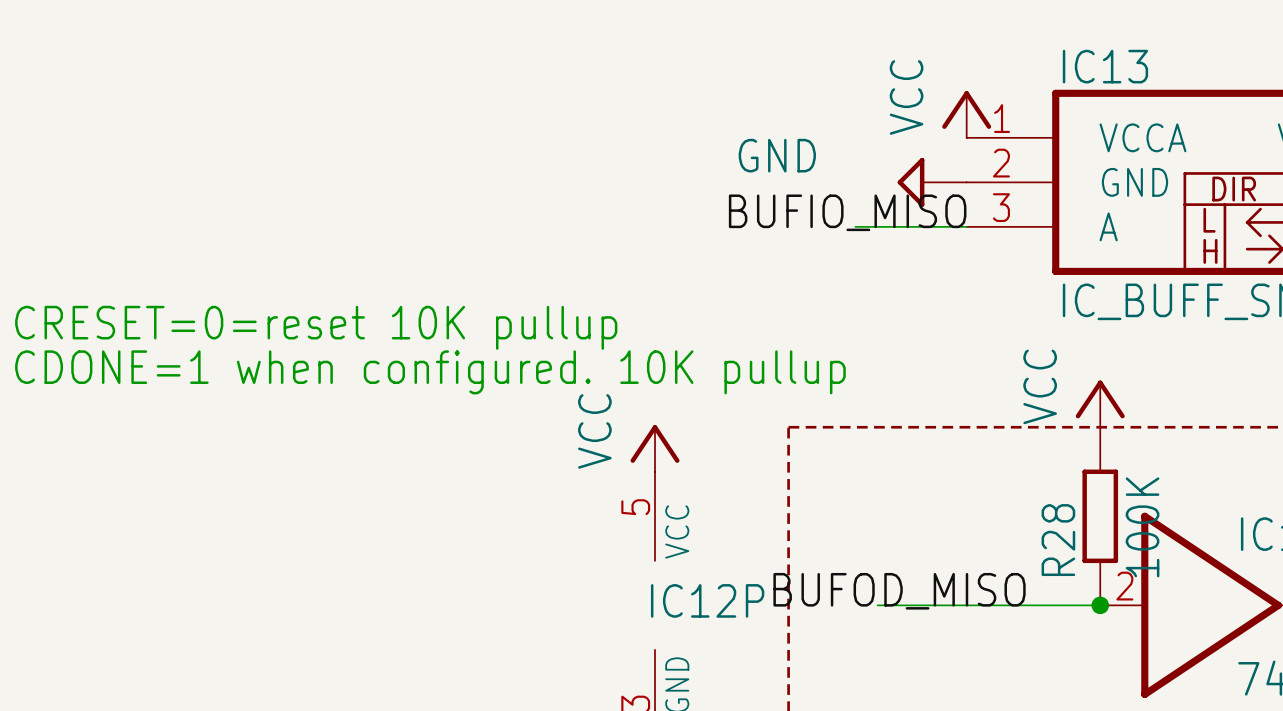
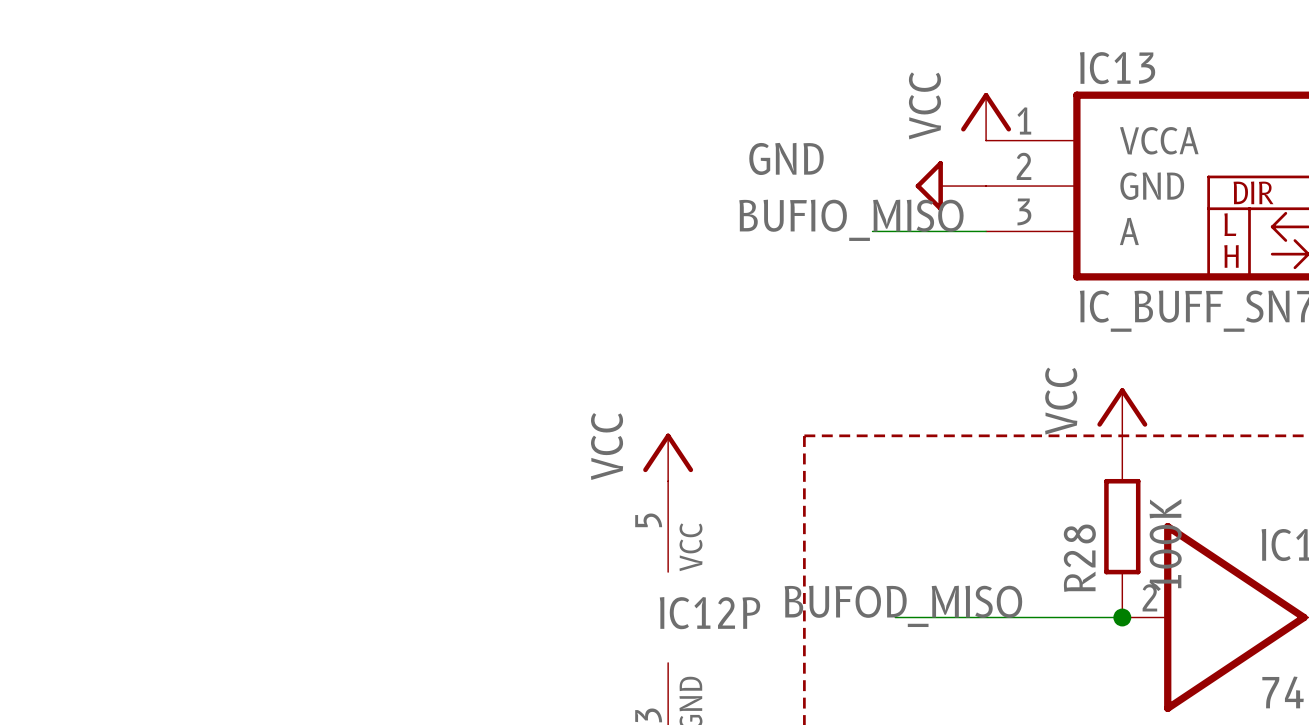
text: CRESET=0=reset 10K pullup (316, 327) -> none
text: CDONE=1 when configured. 10K pullup (430, 372) -> none

